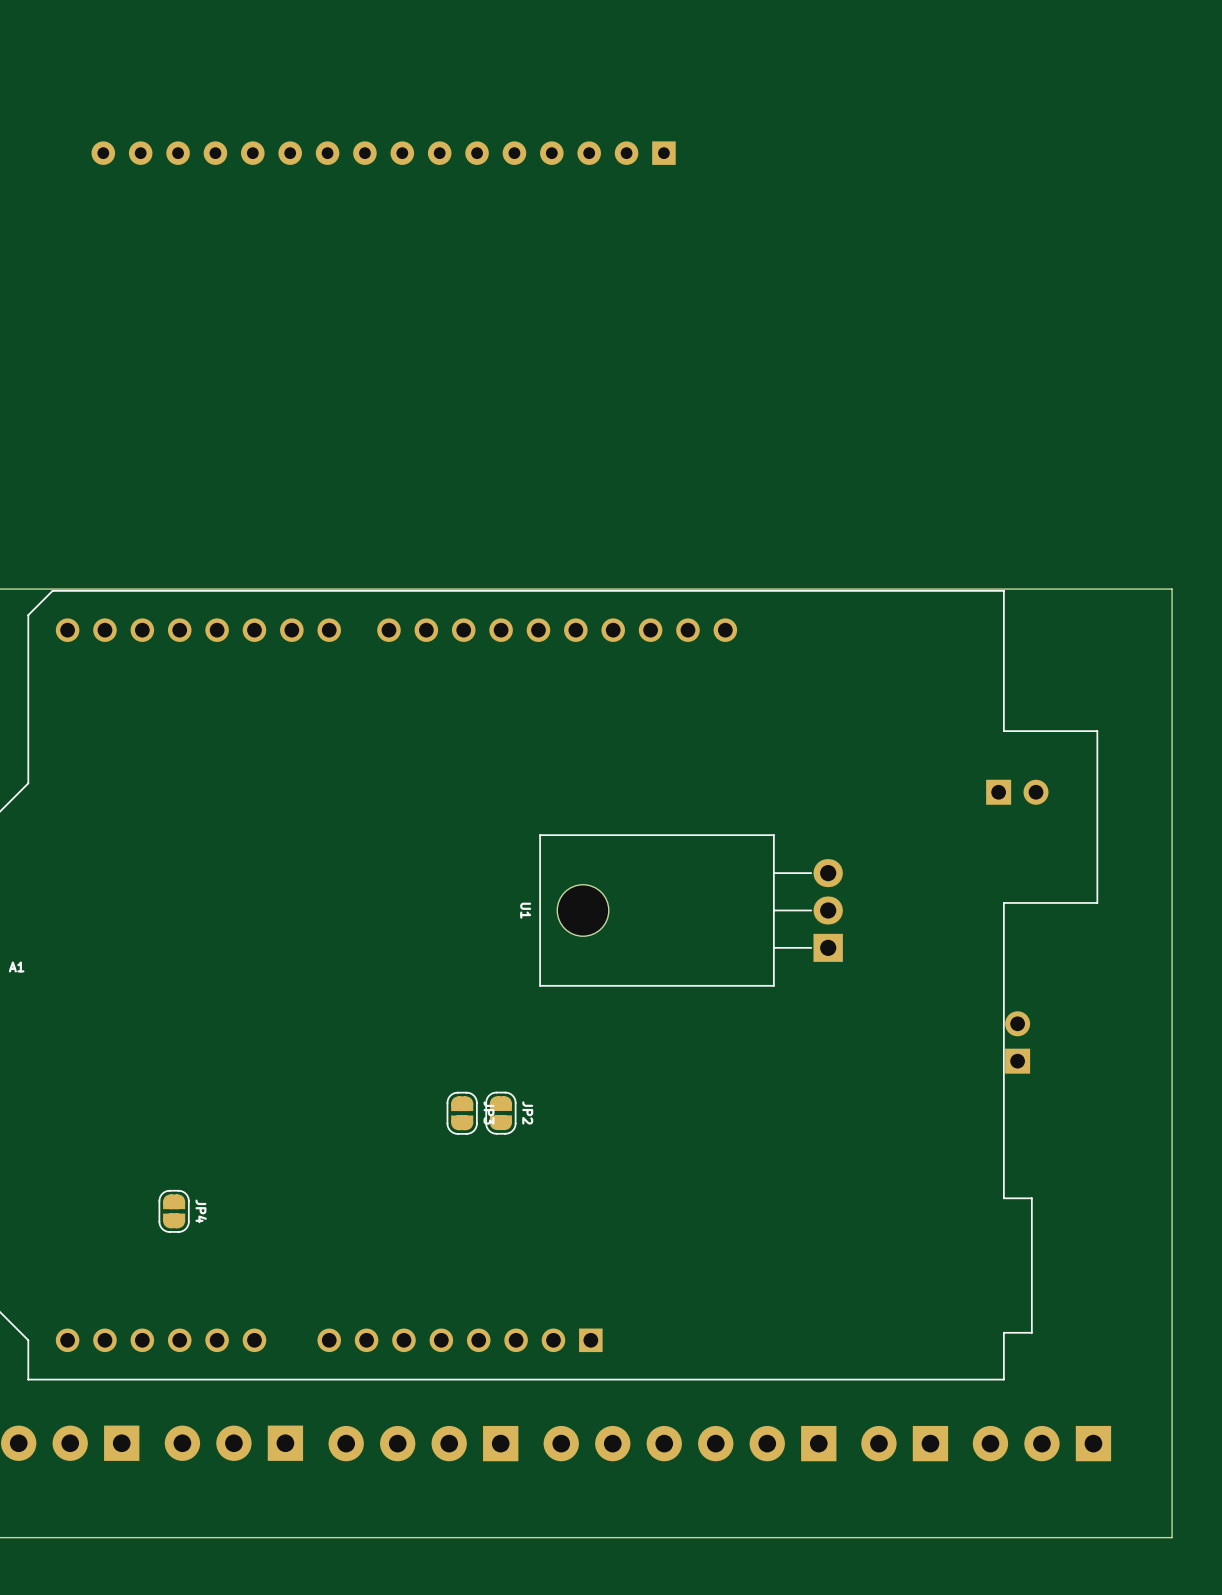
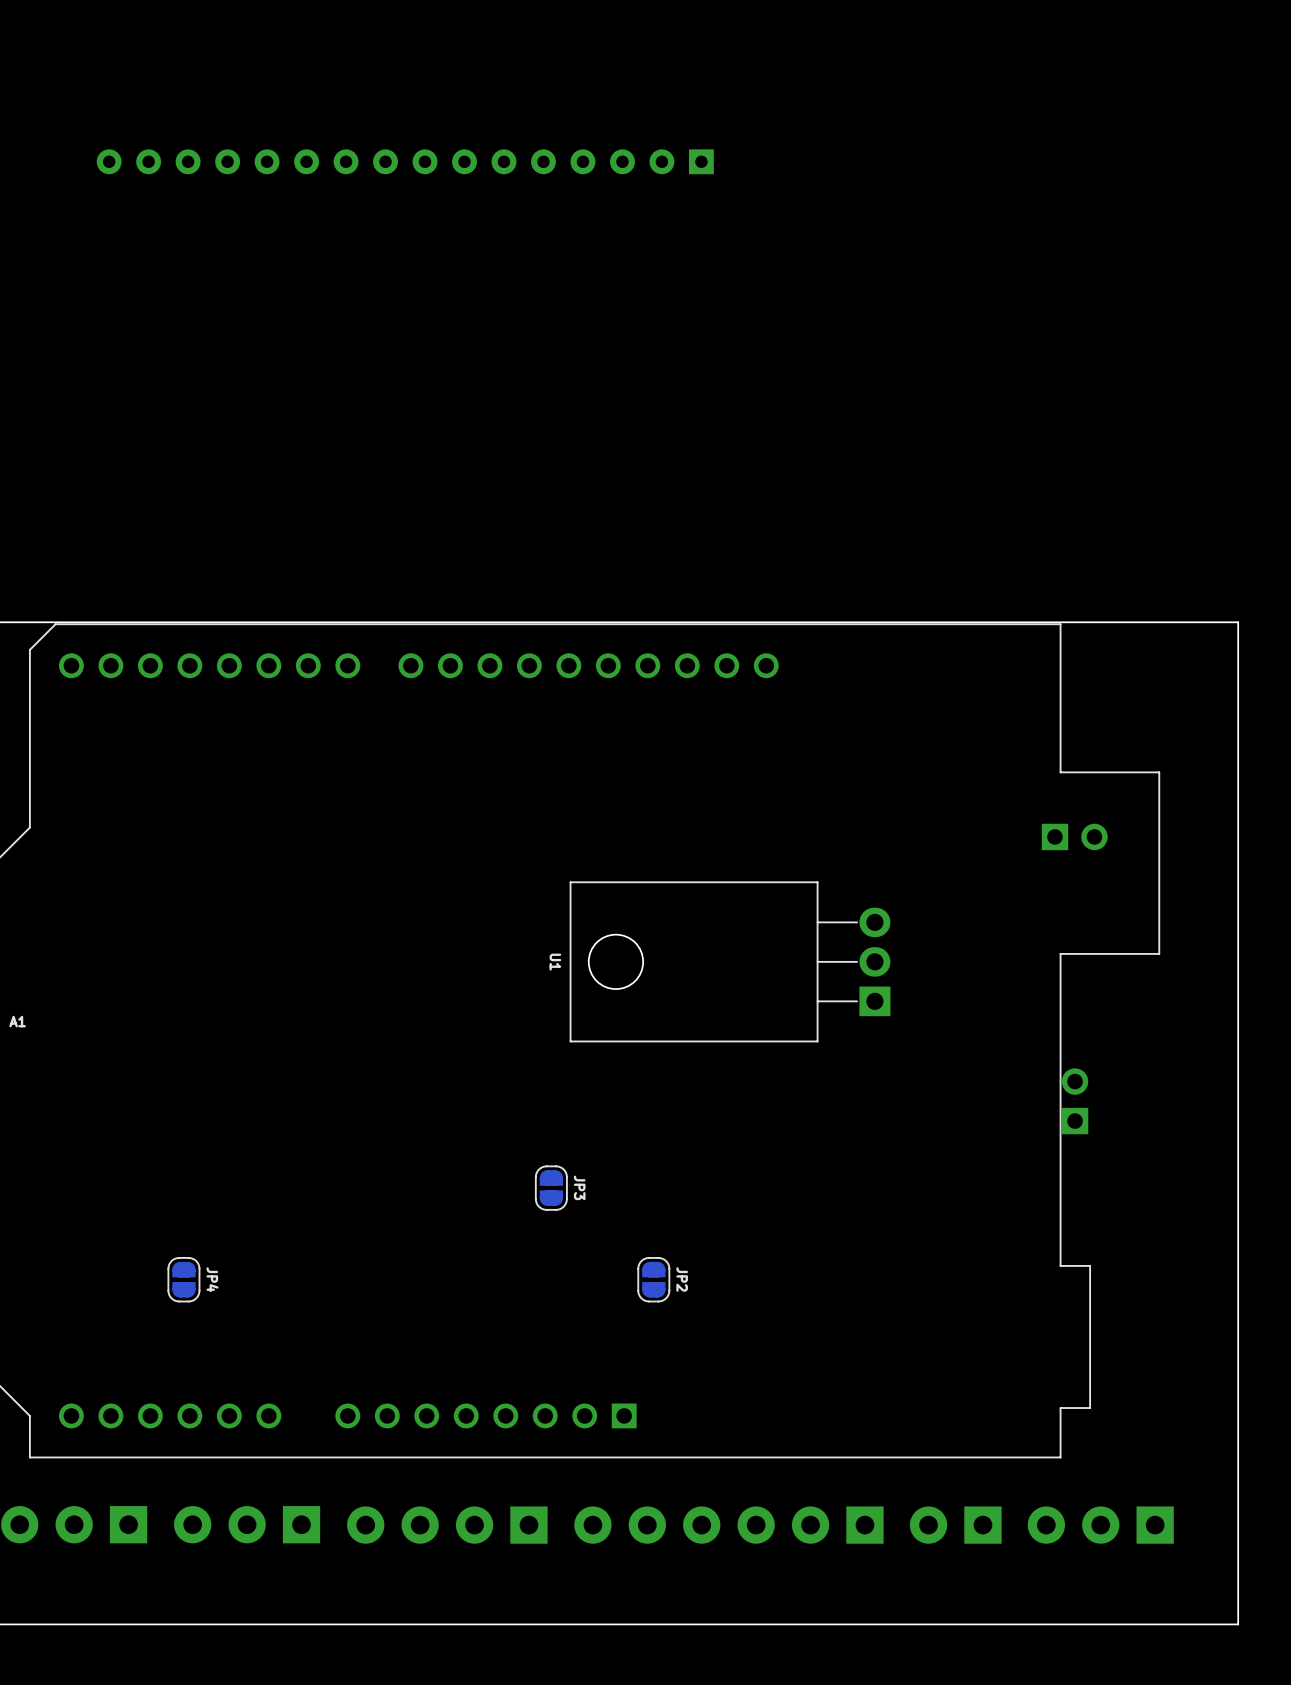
JP3 position: (462, 1113) -> (551, 1188)
JP2 position: (500, 1113) -> (653, 1279)

